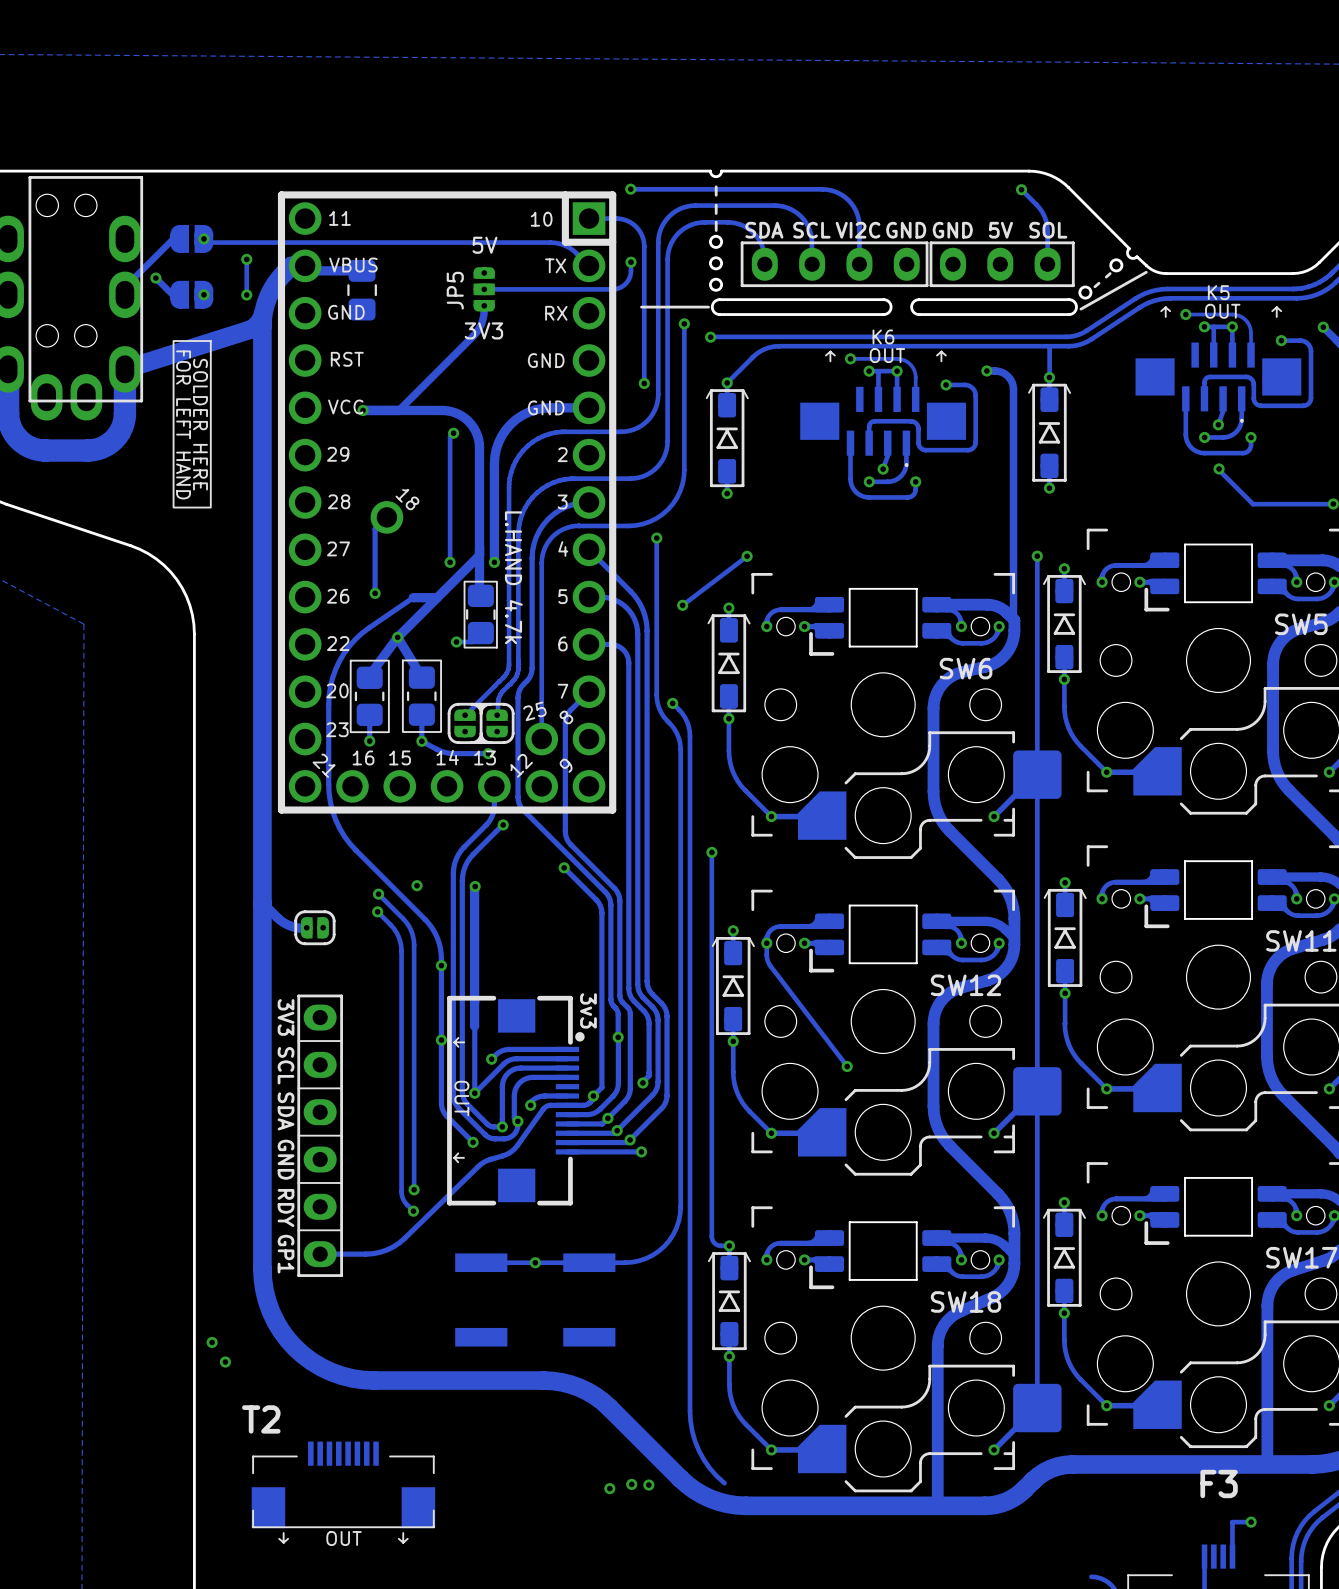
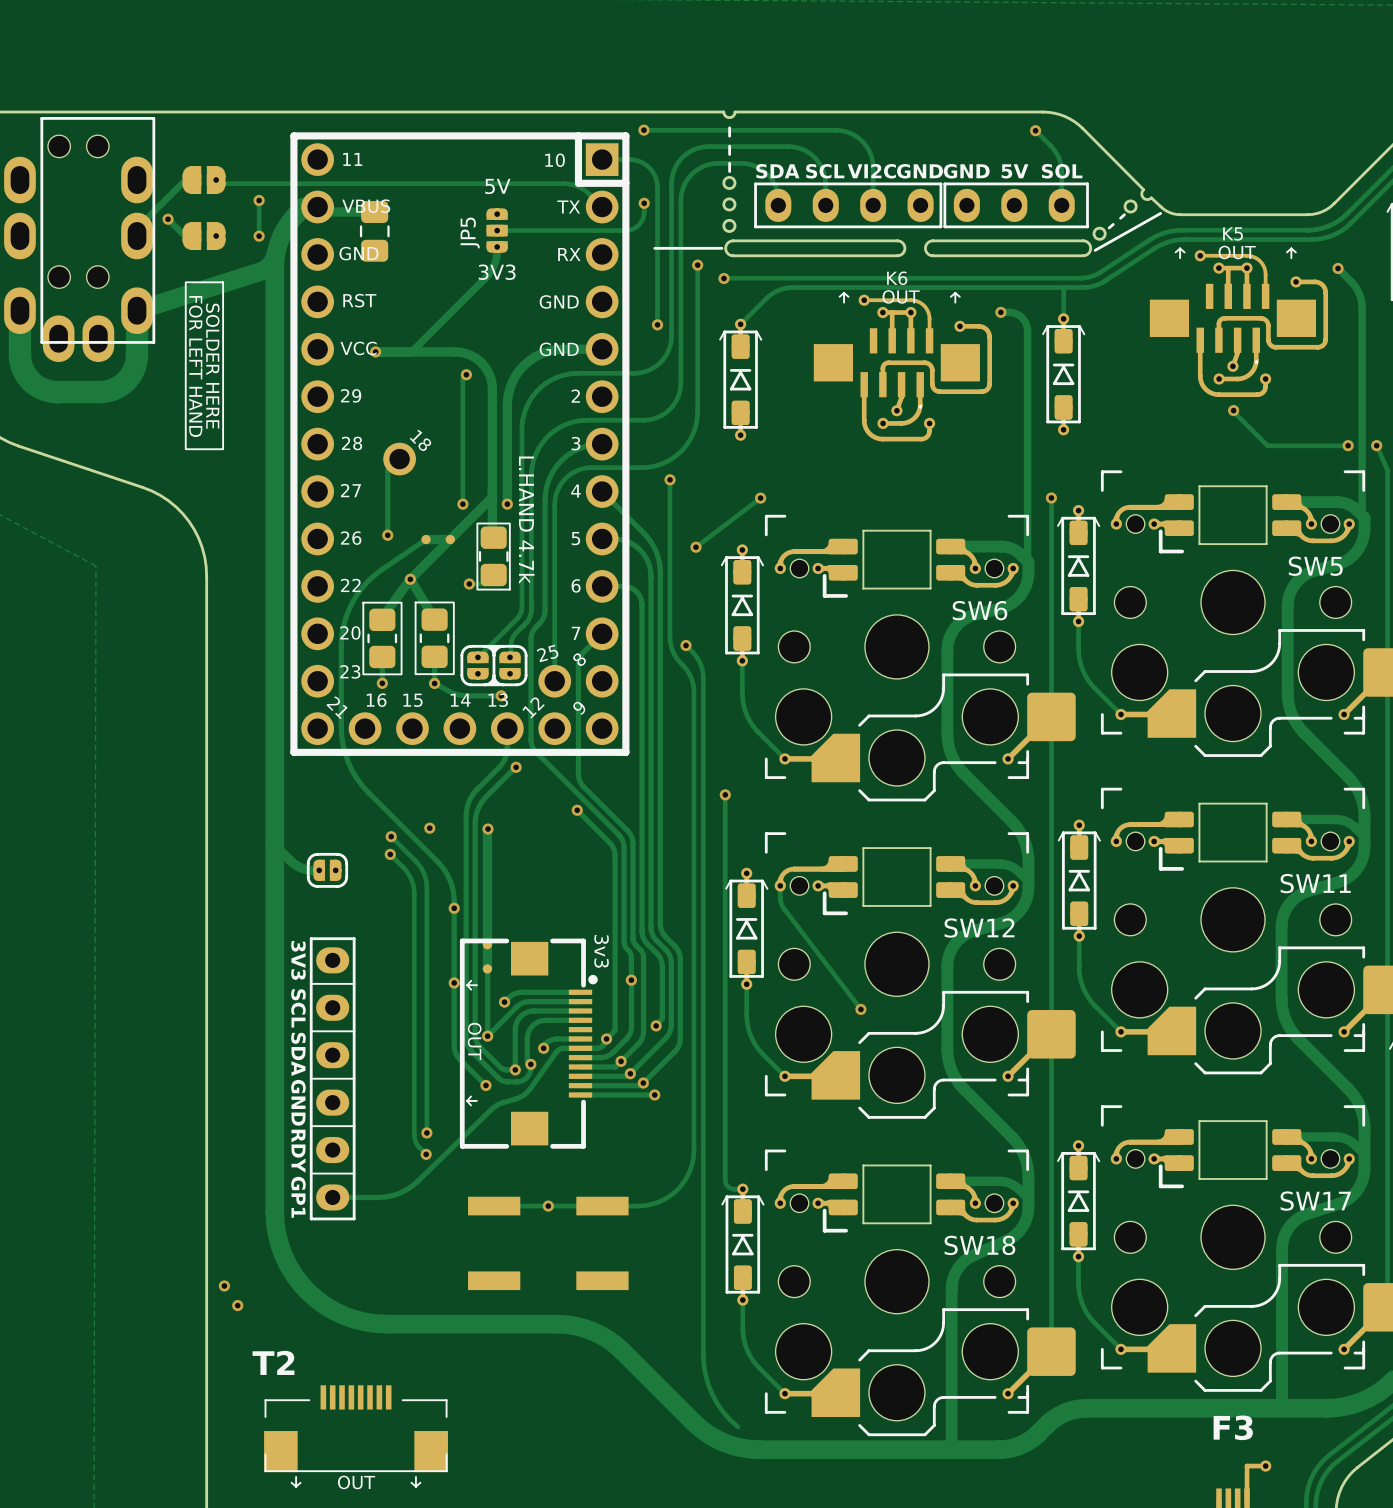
via: (631, 1484) -> none
via: (648, 1485) -> none
via: (609, 1488) -> none

